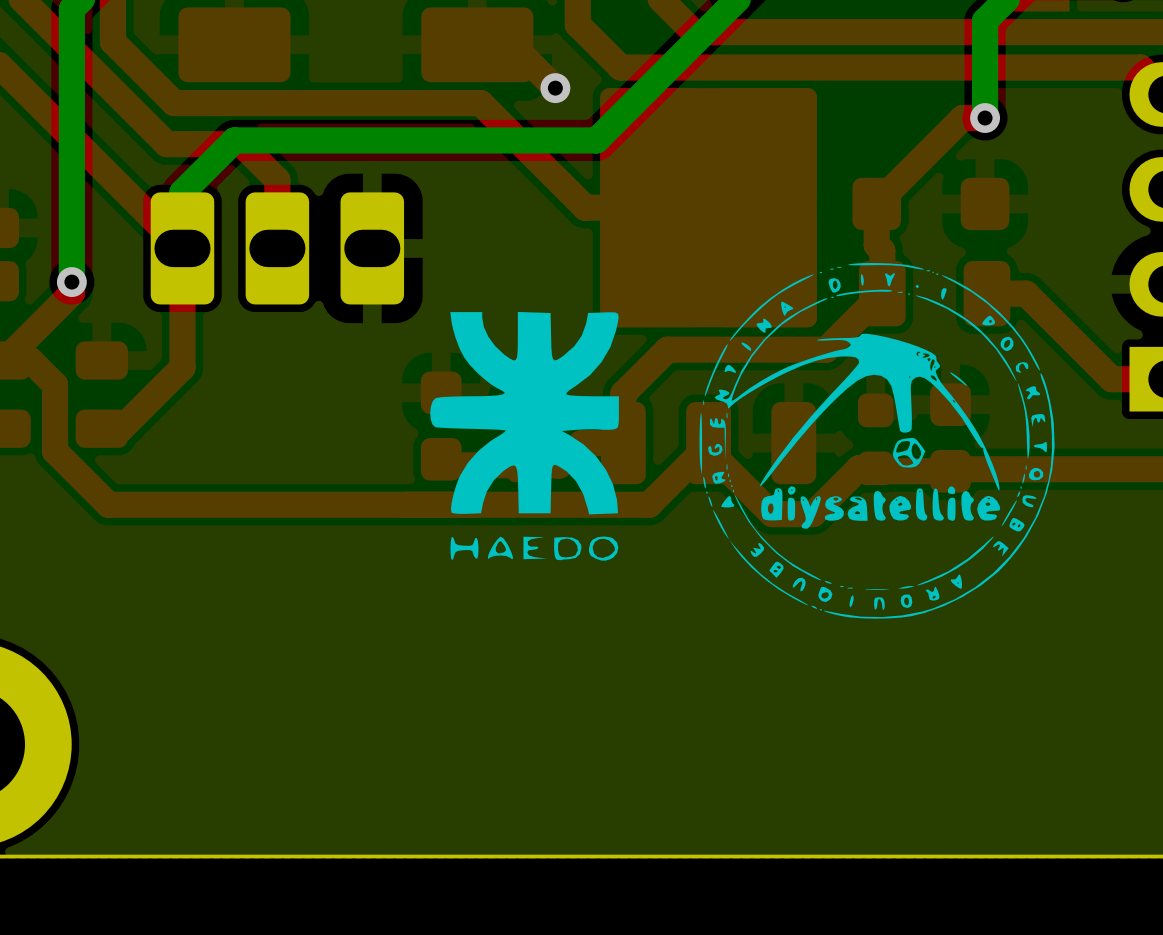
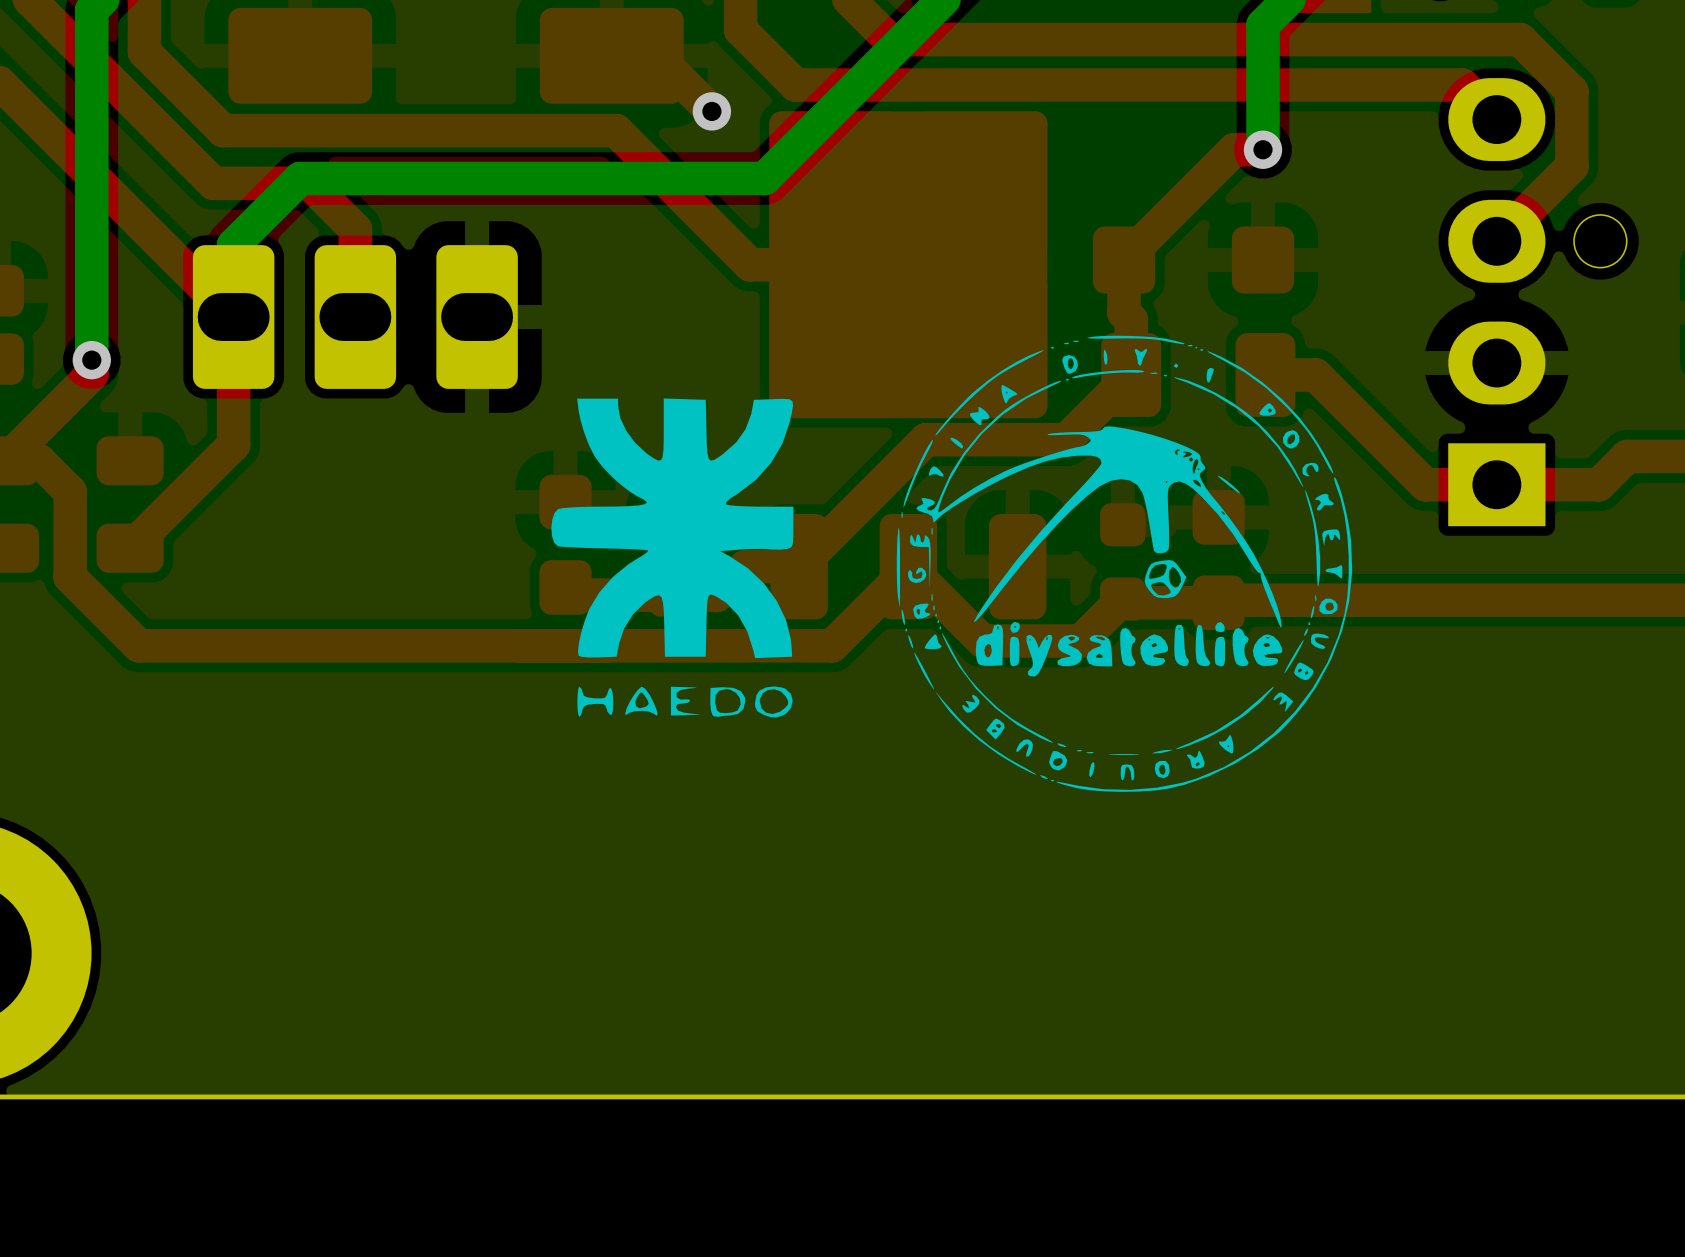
top track: (831, 344) (826, 349) (667, 349) (623, 393) (623, 443) -> (1066, 439) (926, 439) (799, 566)
top track: (182, 348) (182, 367) (121, 428) (101, 428) -> (233, 444) (130, 548)
top track: (708, 445) (708, 450) (772, 514) (813, 514) (858, 468) (875, 468) -> (908, 566) (982, 641) (1080, 641) (1122, 599)

